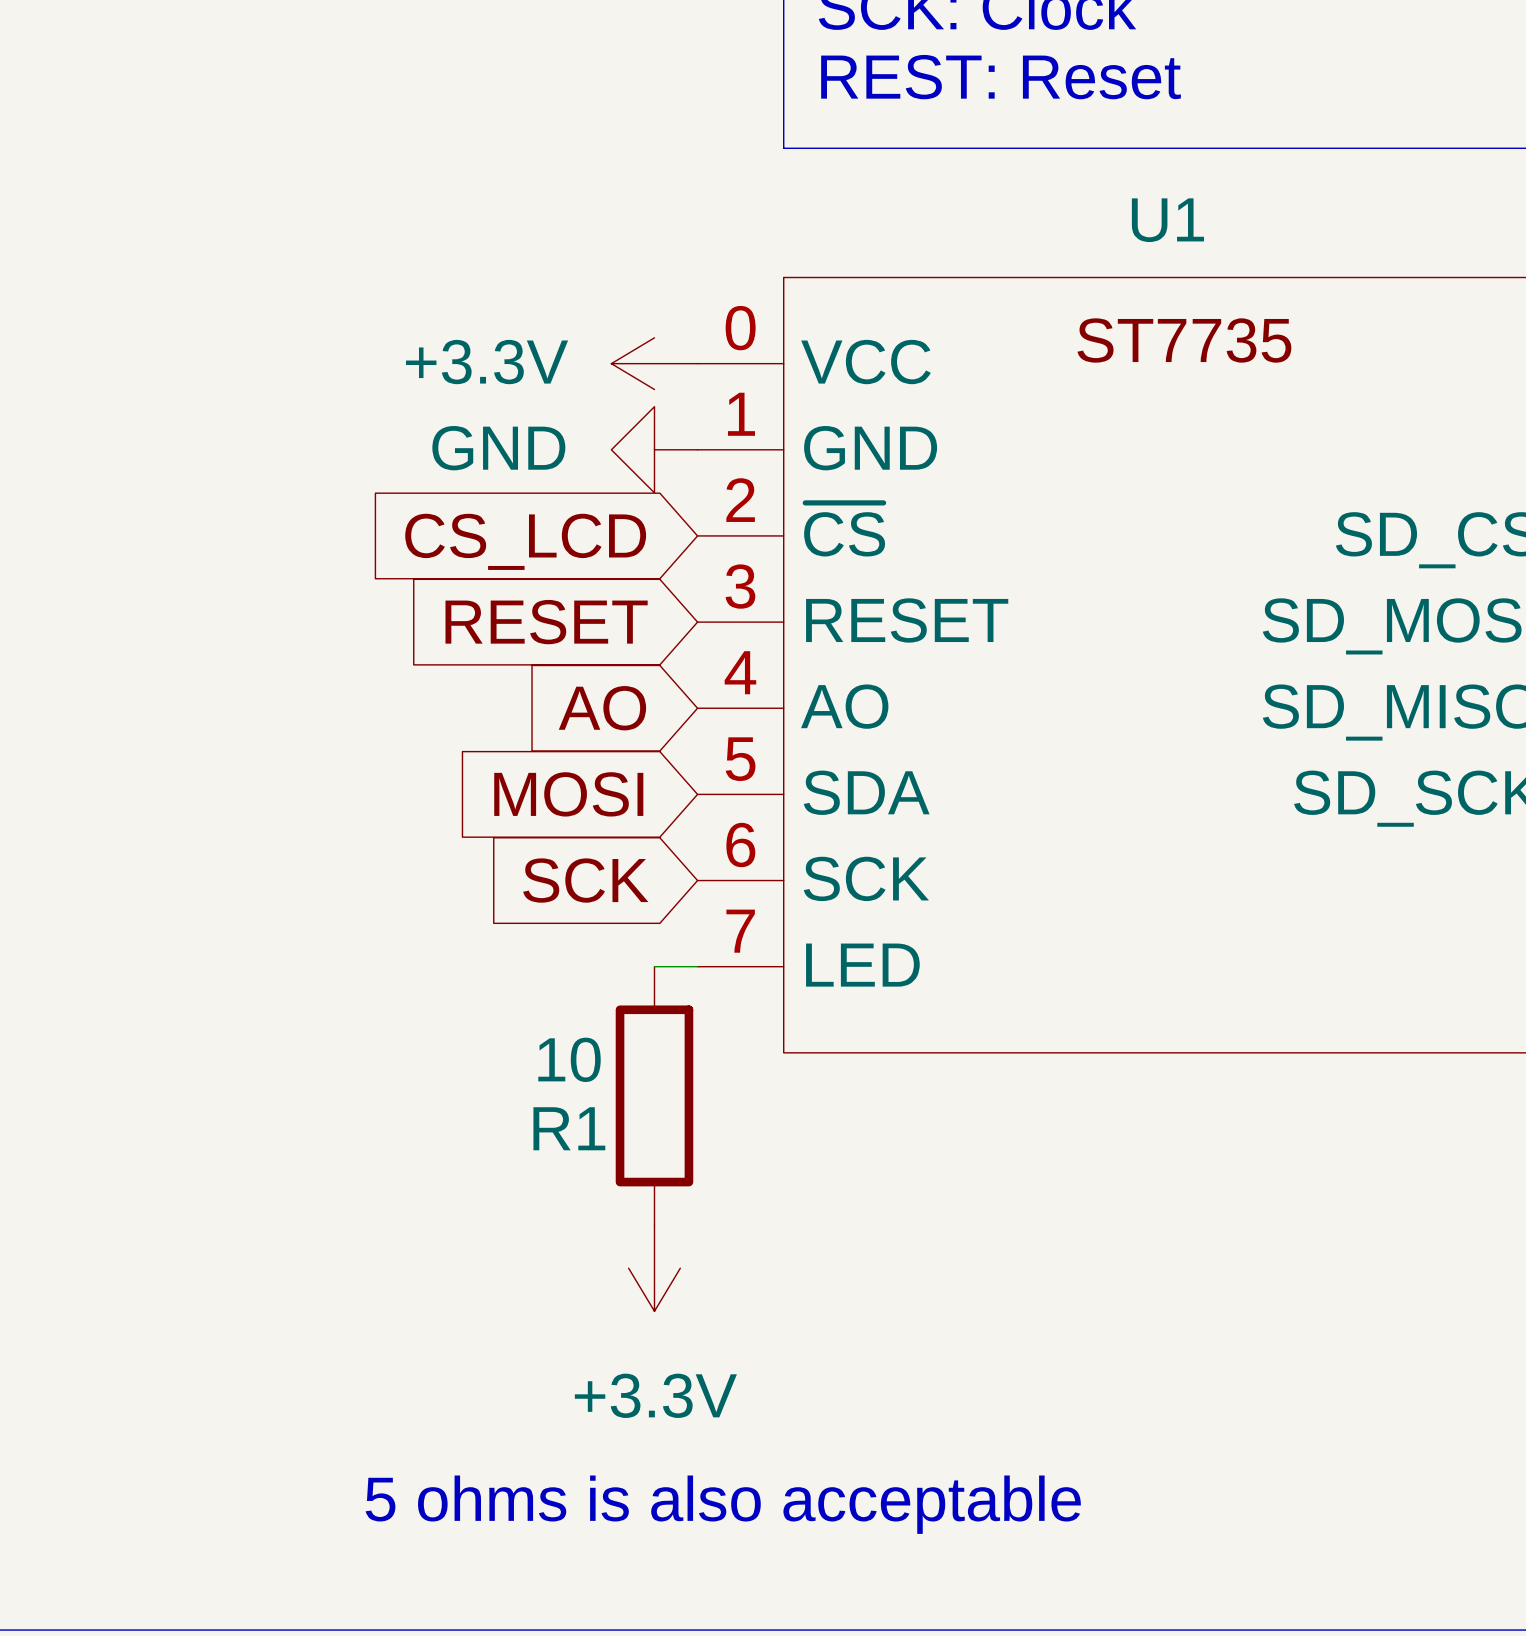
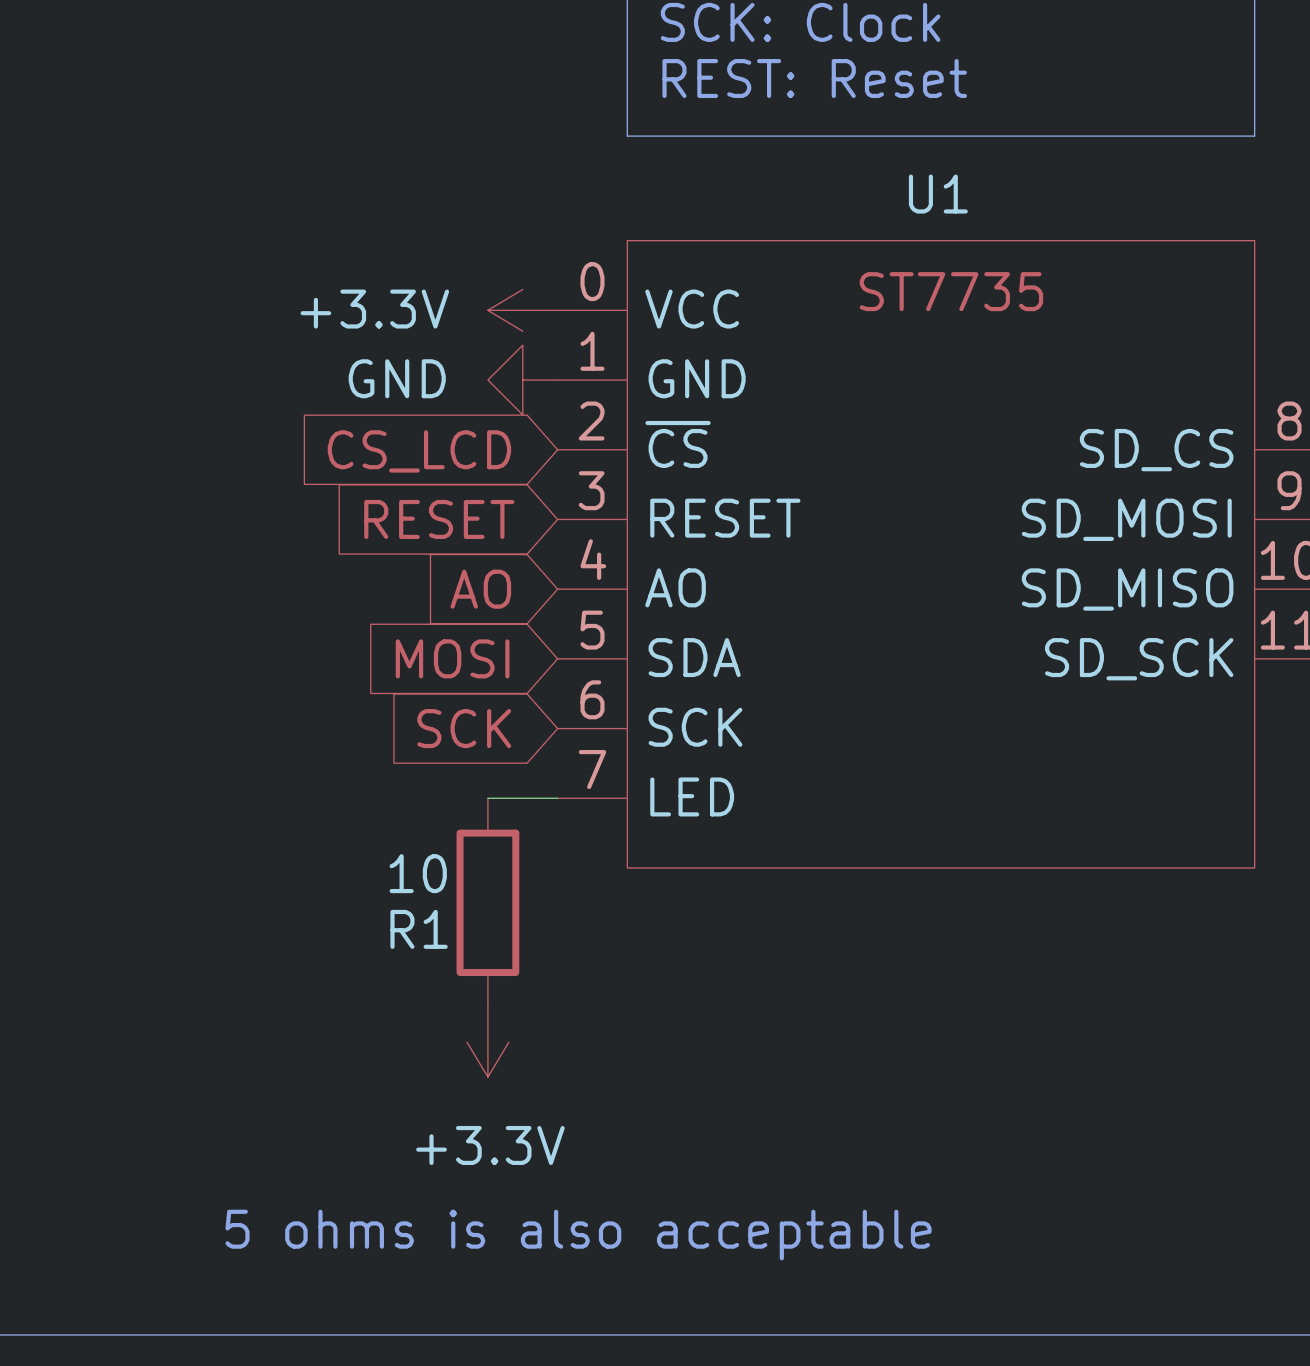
wire: none -> (487, 798) (522, 798)
R1 position: (654, 1095) -> (487, 902)
power symbol position: +3.3V (654, 1268) -> +3.3V (487, 1042)

